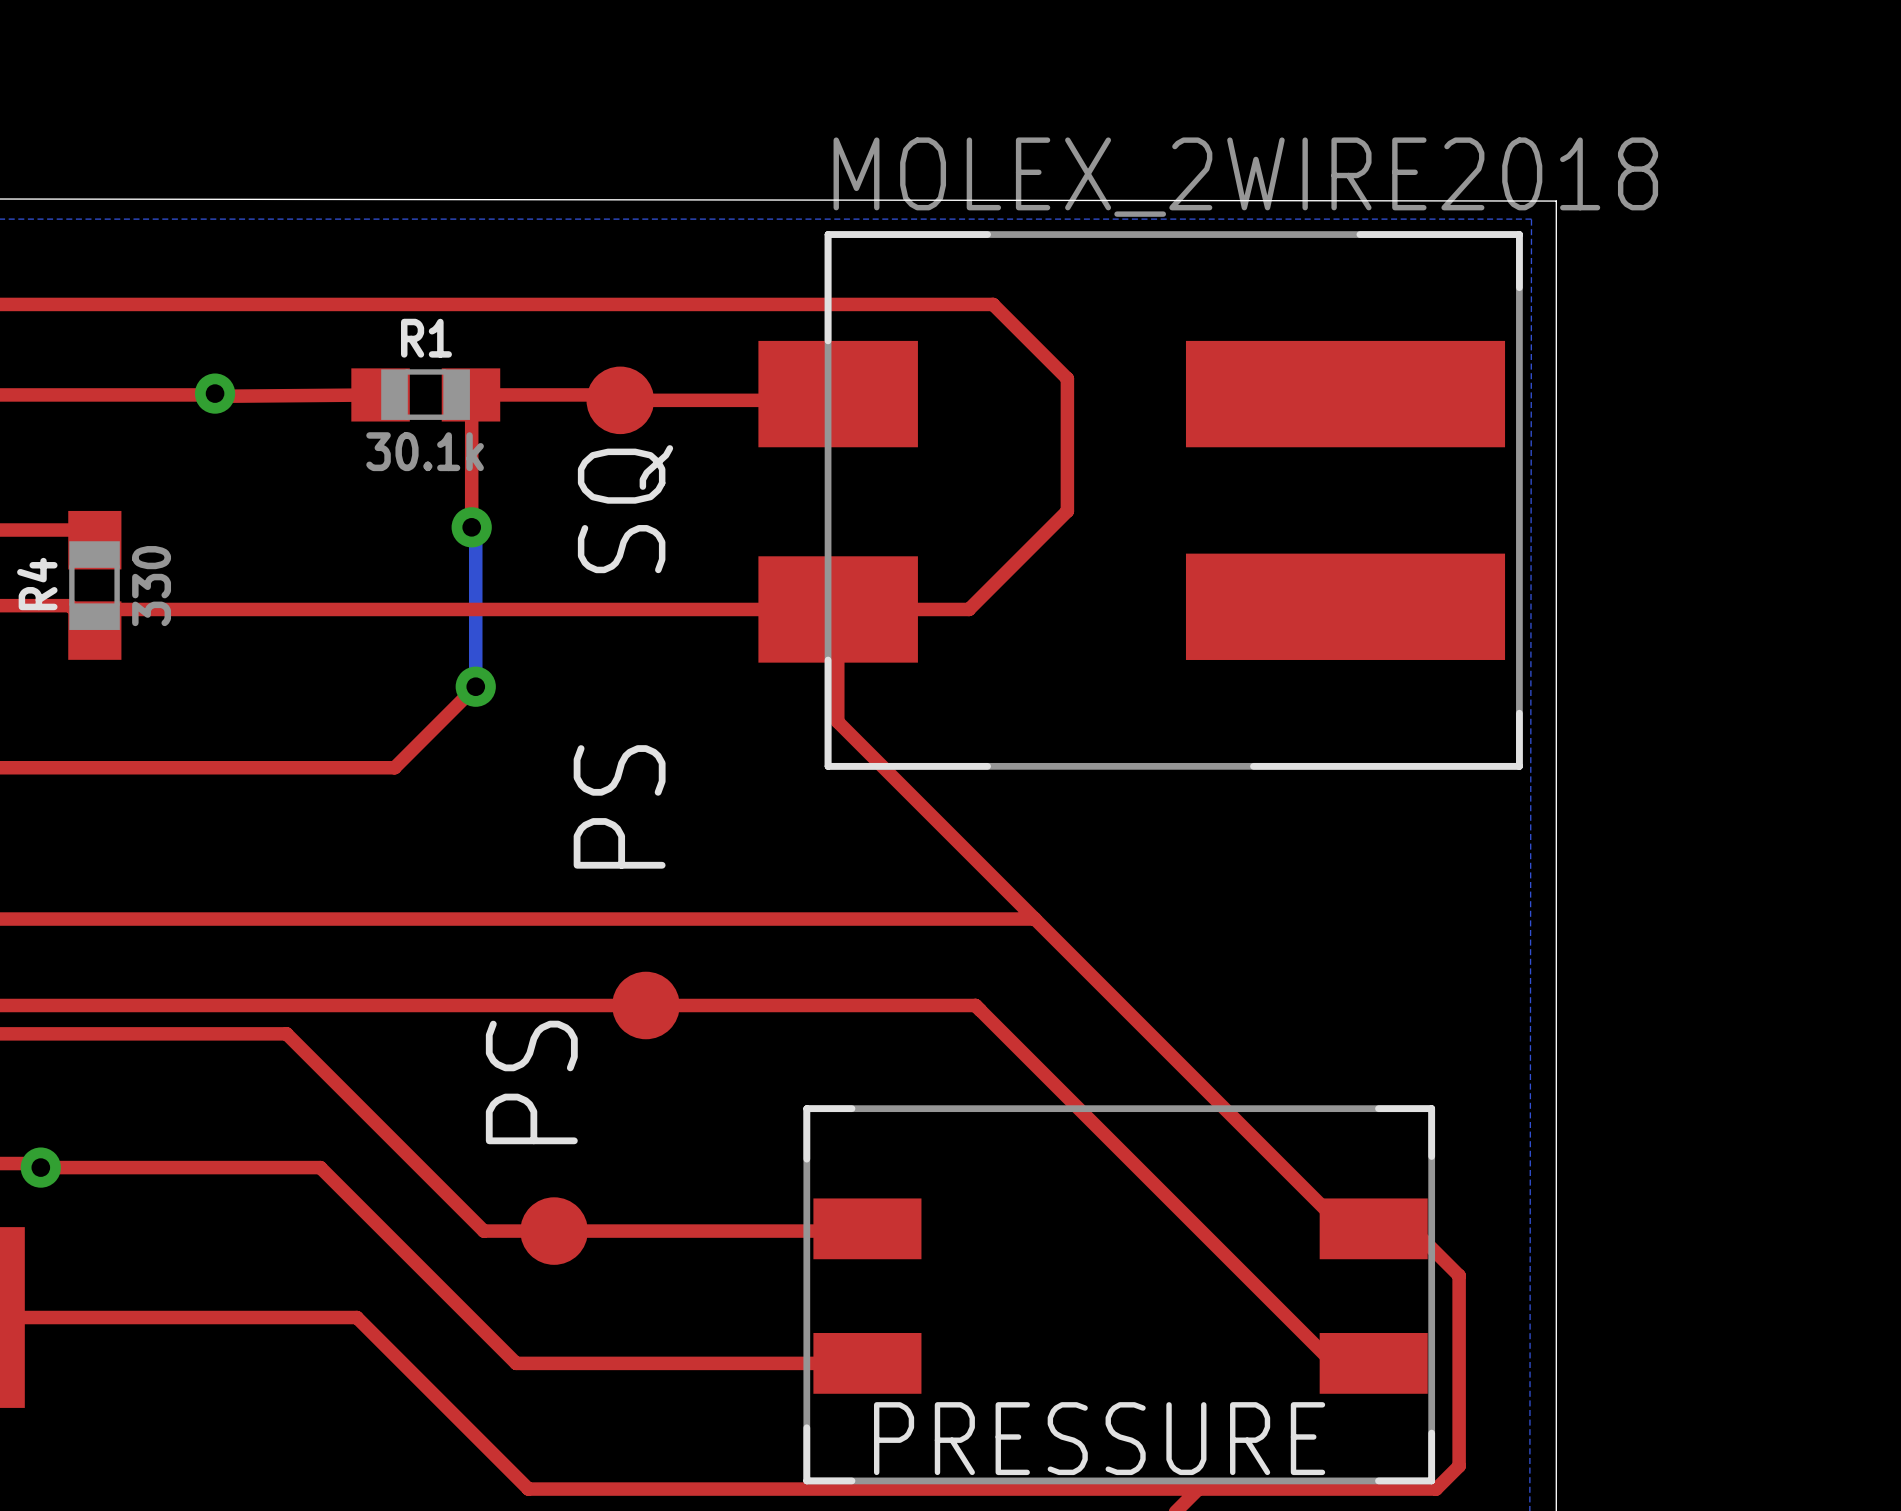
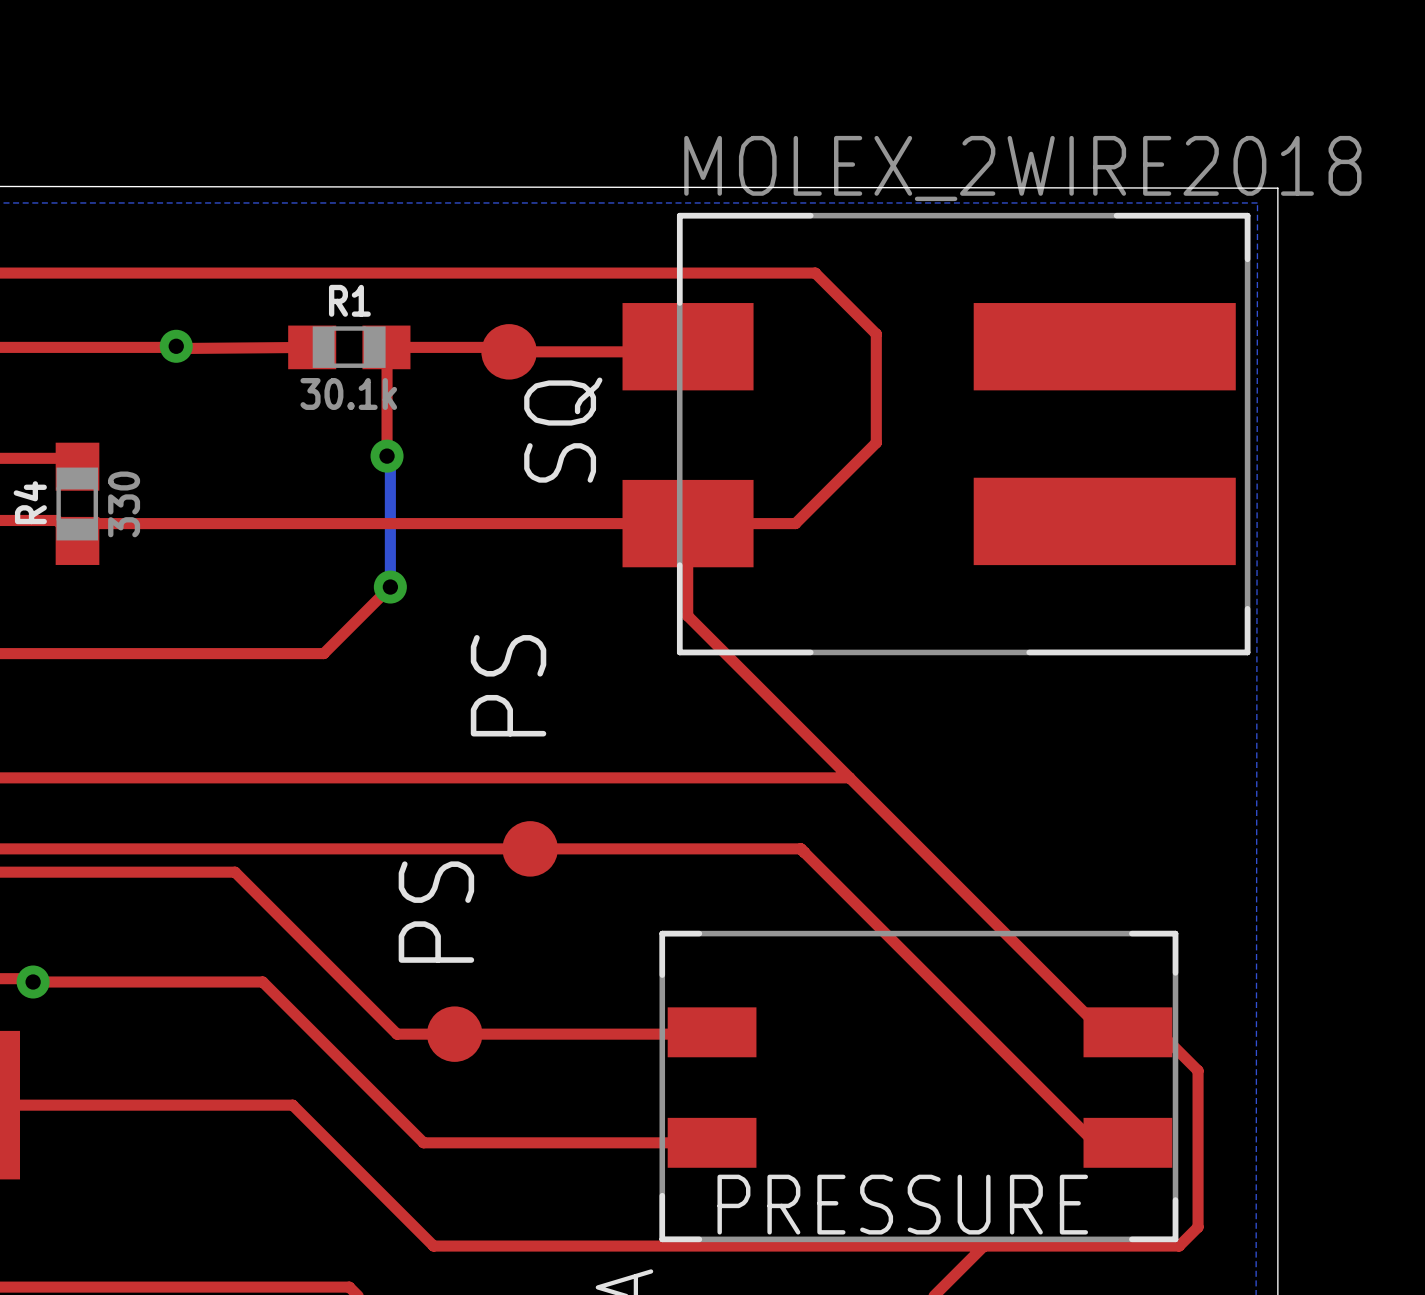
text position: SQ (625, 509) -> SQ (563, 430)

